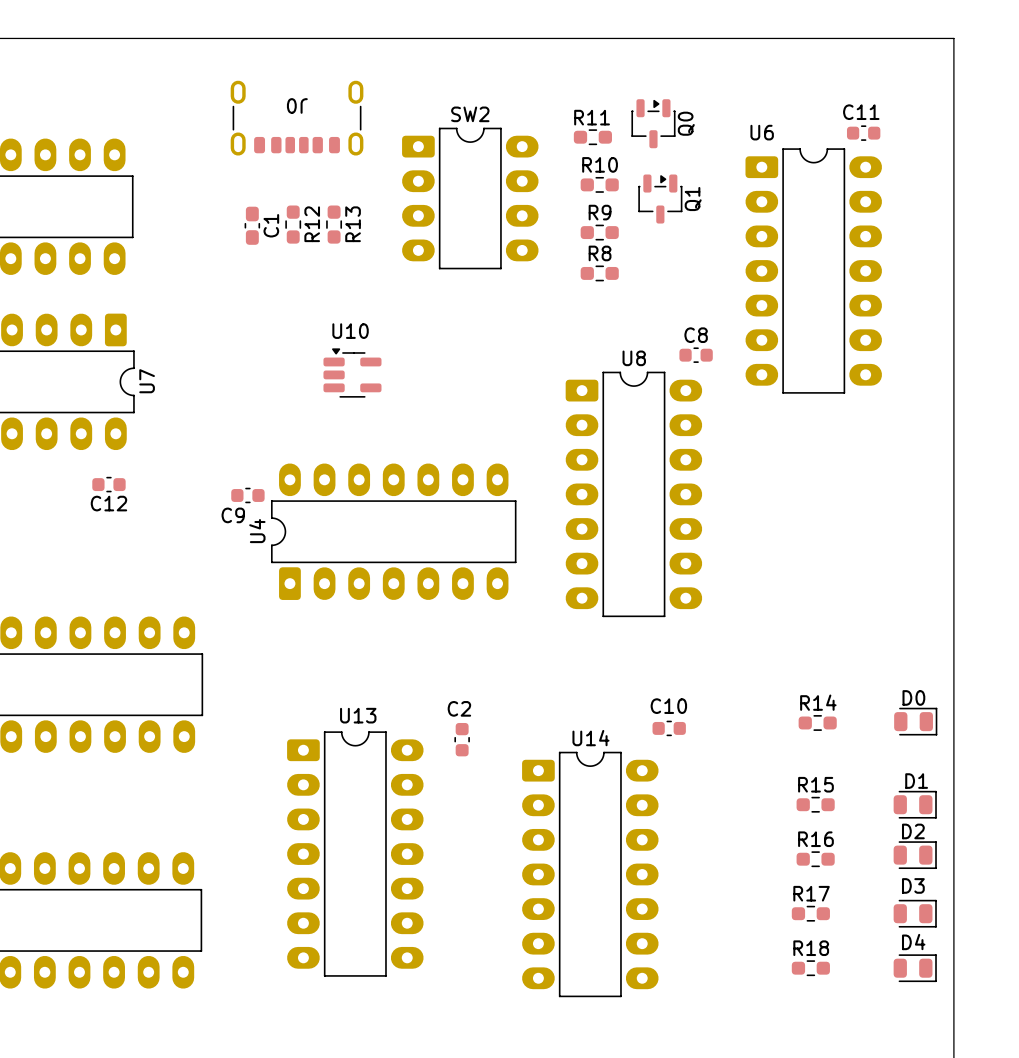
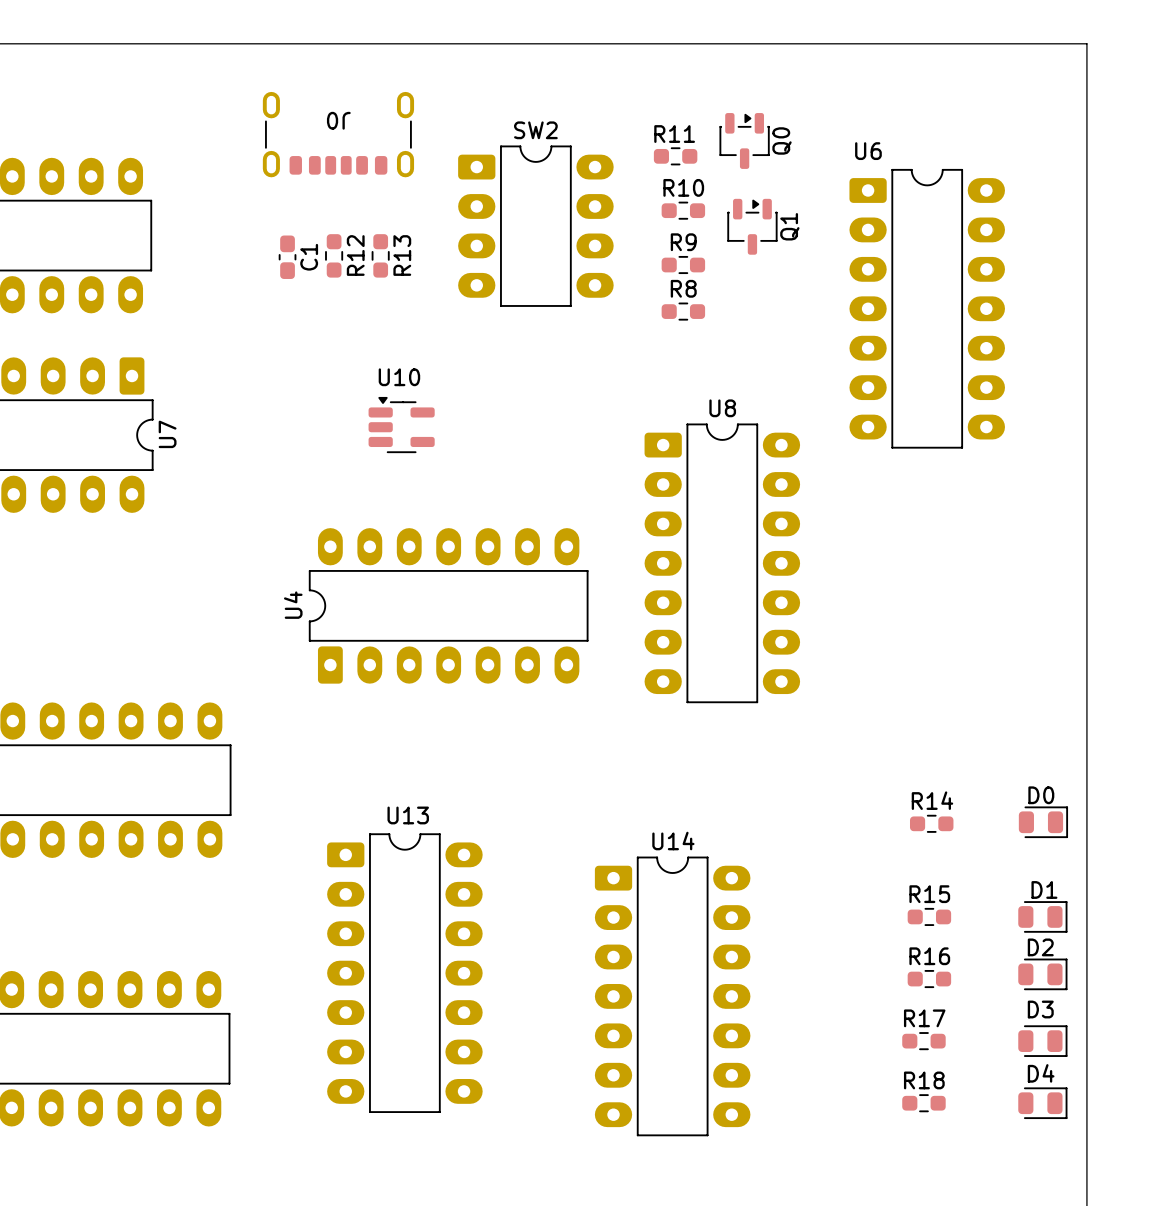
C11: (863, 133) -> none
C8: (696, 355) -> none
C12: (108, 484) -> none
C9: (247, 495) -> none
C10: (669, 728) -> none
C2: (462, 739) -> none

